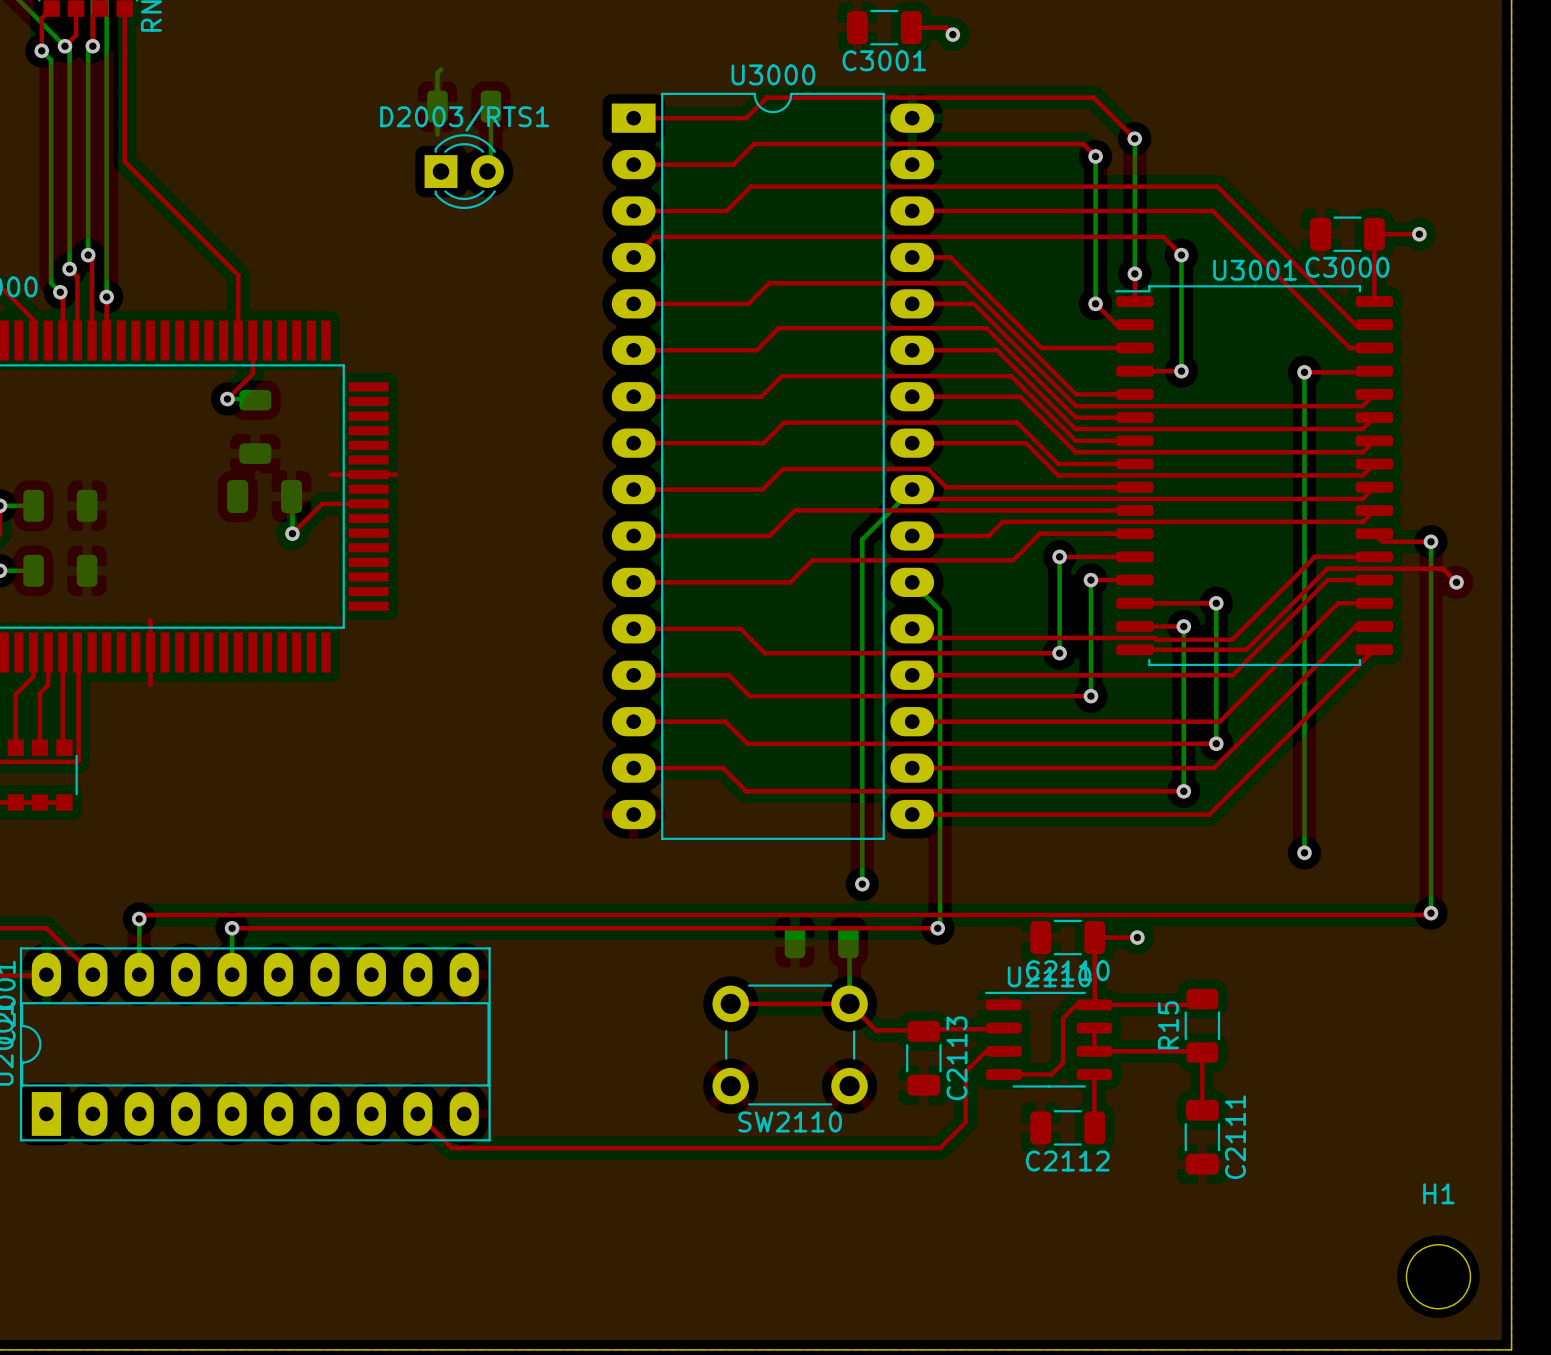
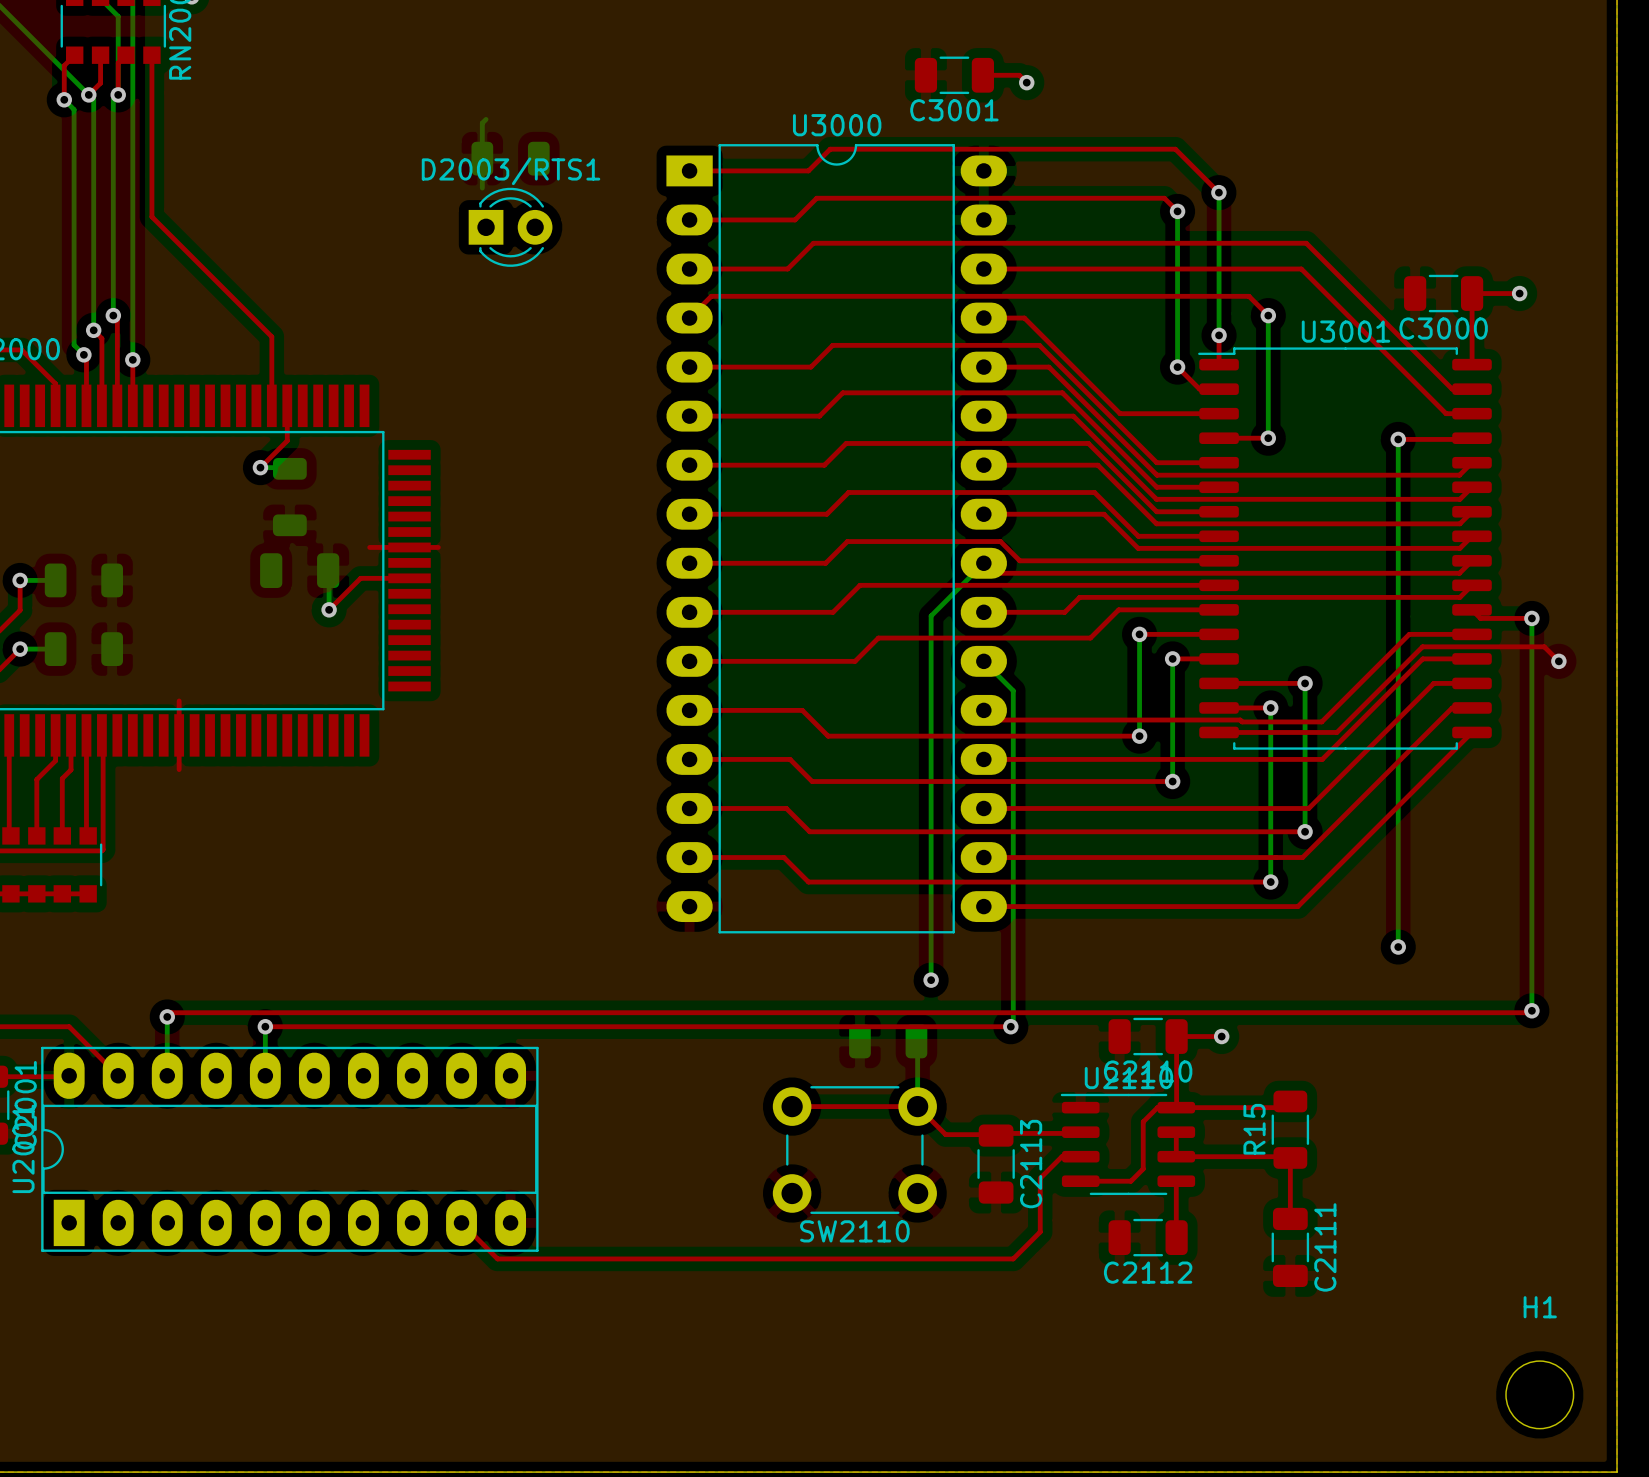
bottom track: (490, 106) (490, 168) (487, 171) -> none

